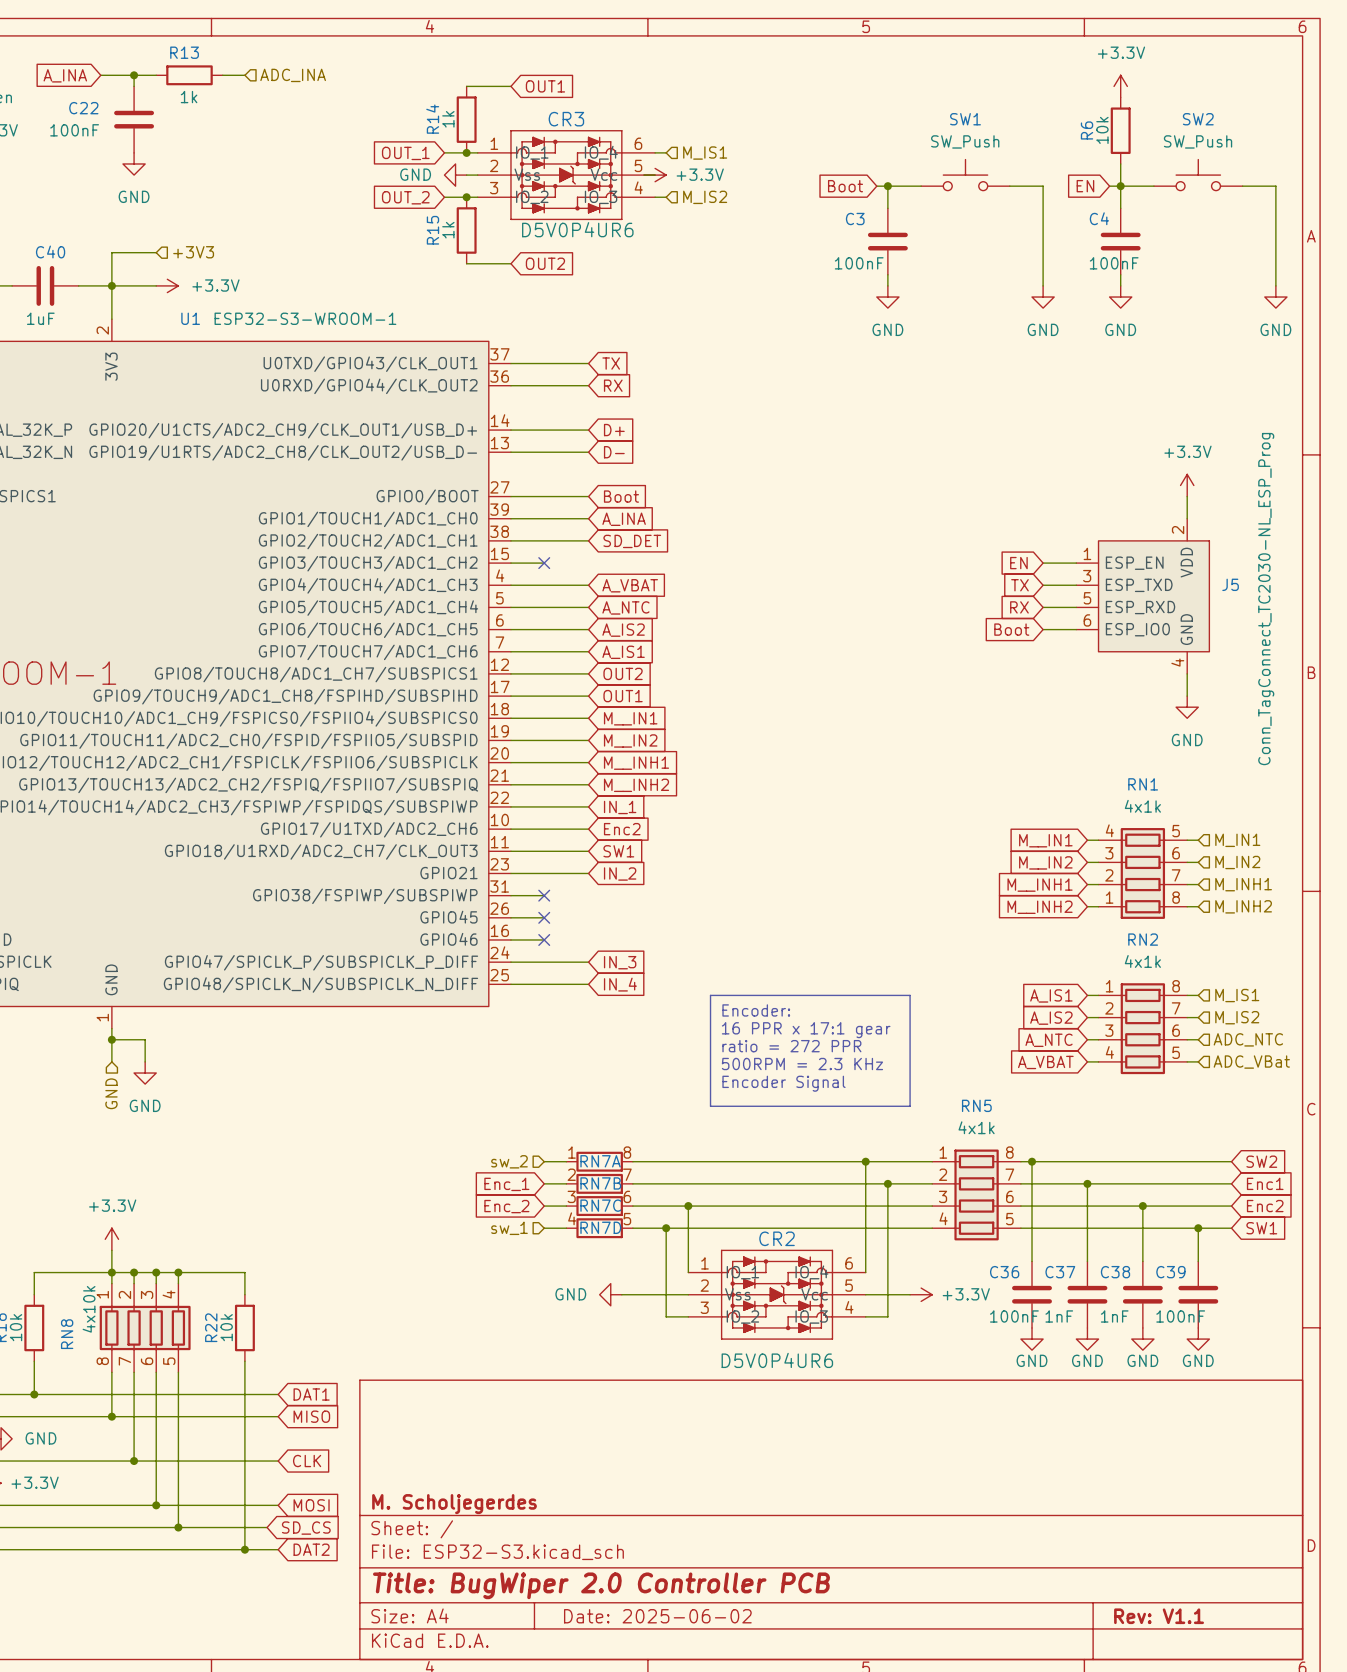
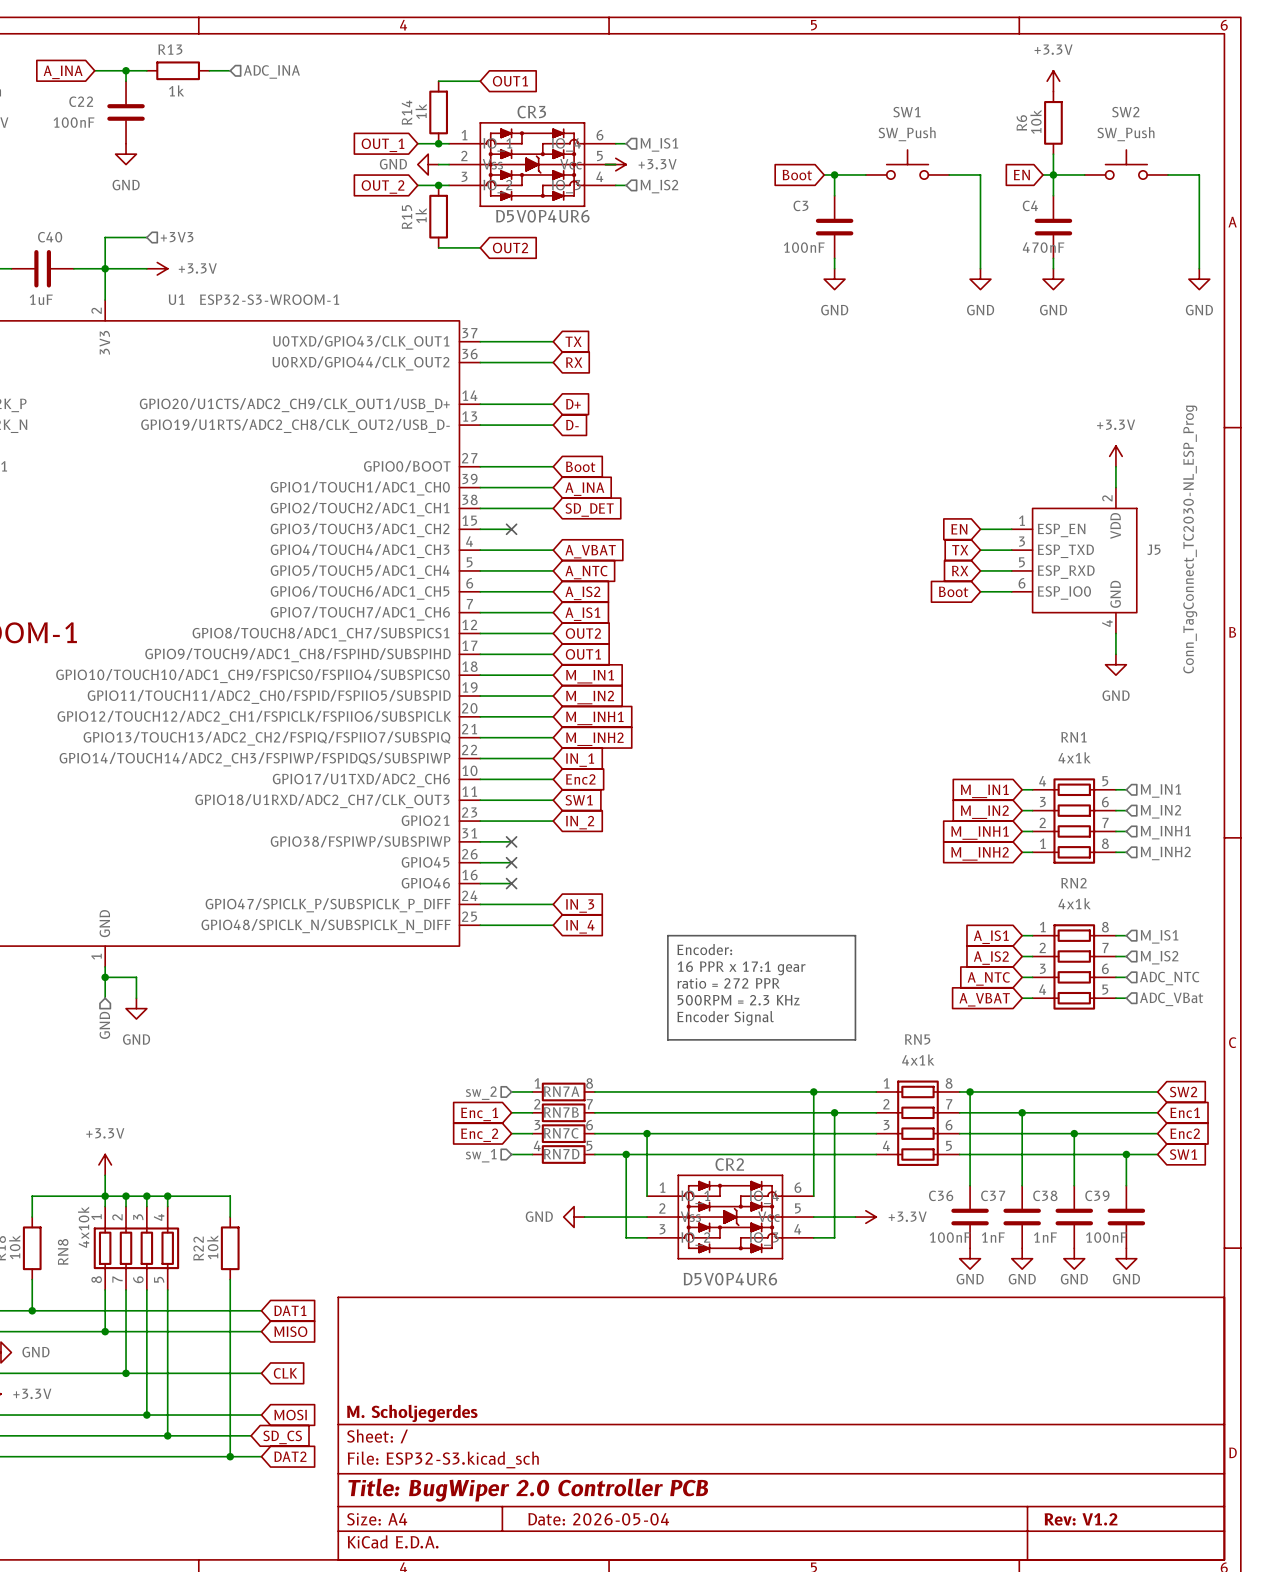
C4 value: 100nF (1114, 263) -> 470nF (1043, 247)
title block: Date: 2025-06-02 (657, 1616) -> Date: 2026-05-04 (598, 1519)
title block: Rev: V1.1 (1159, 1616) -> Rev: V1.2 (1081, 1519)

